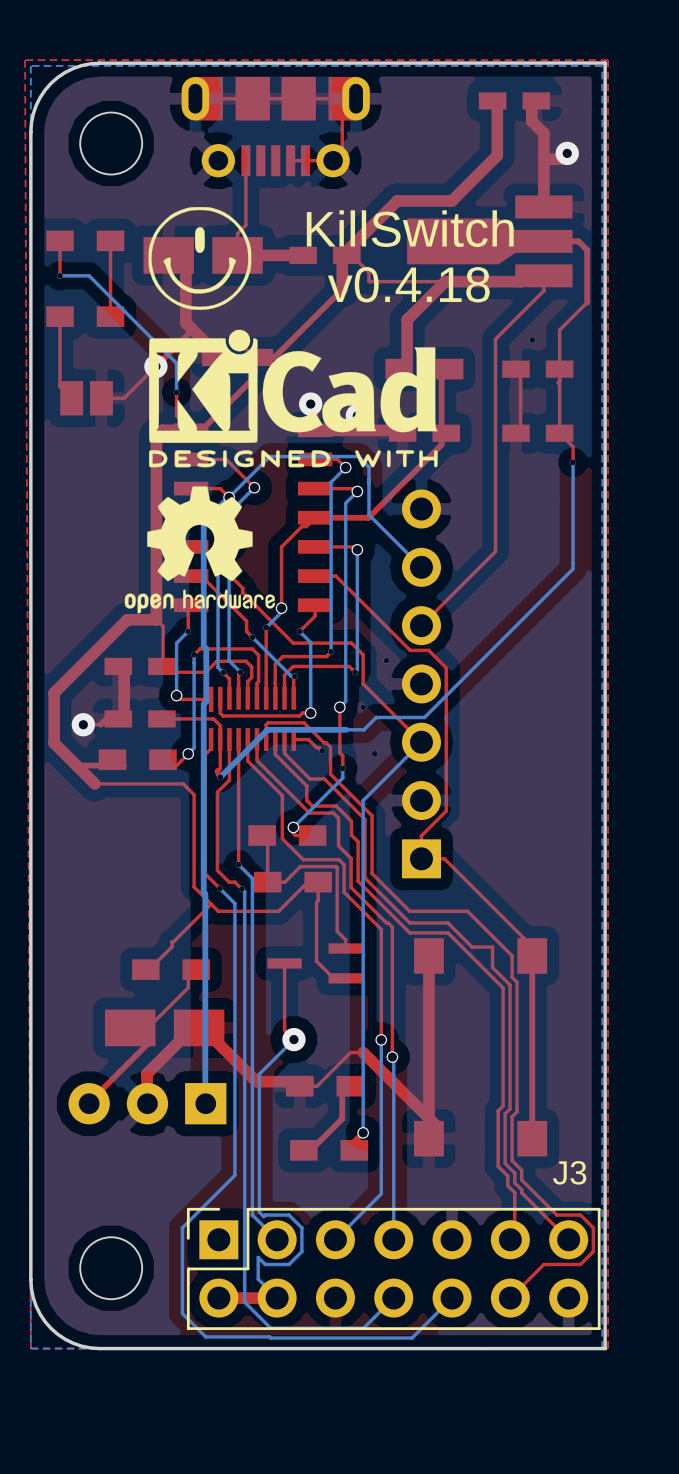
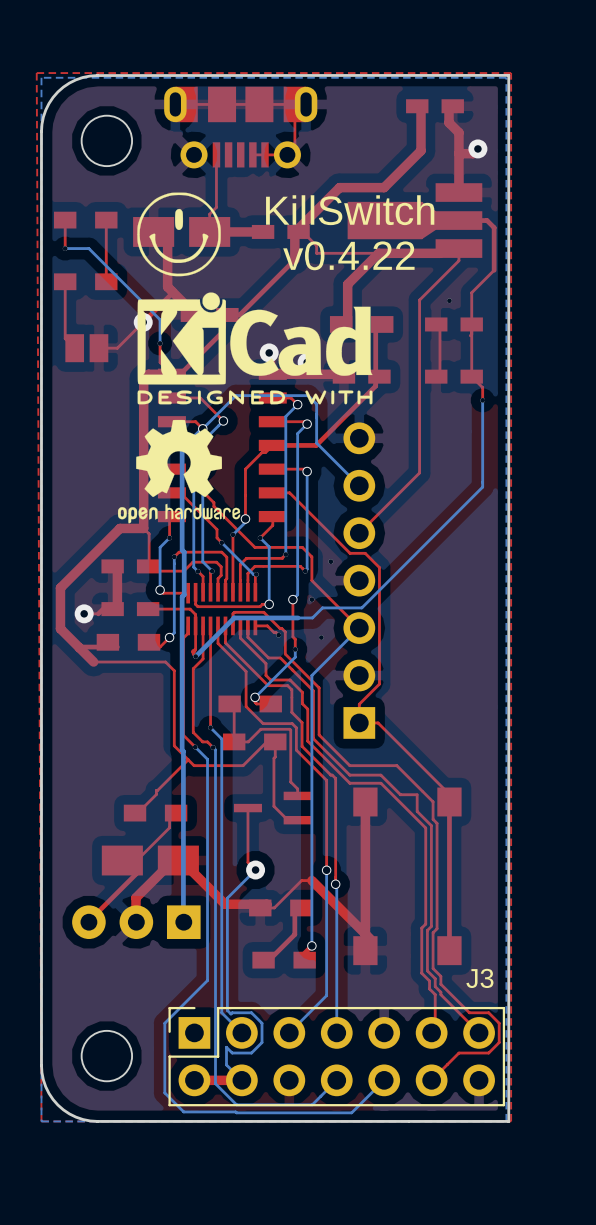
text: v0.4.18 (408, 284) -> v0.4.22 (348, 255)

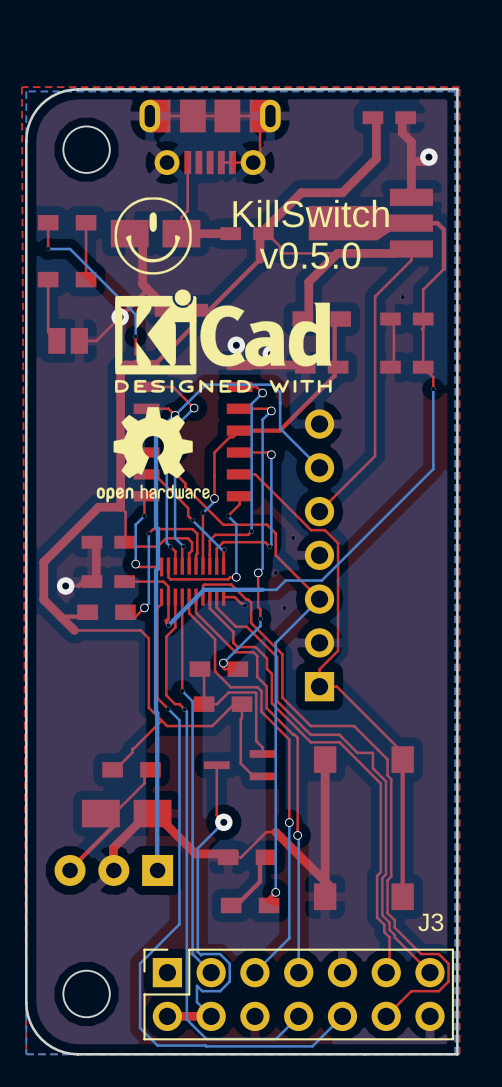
text: v0.4.22 (348, 255) -> v0.5.0 (310, 255)

